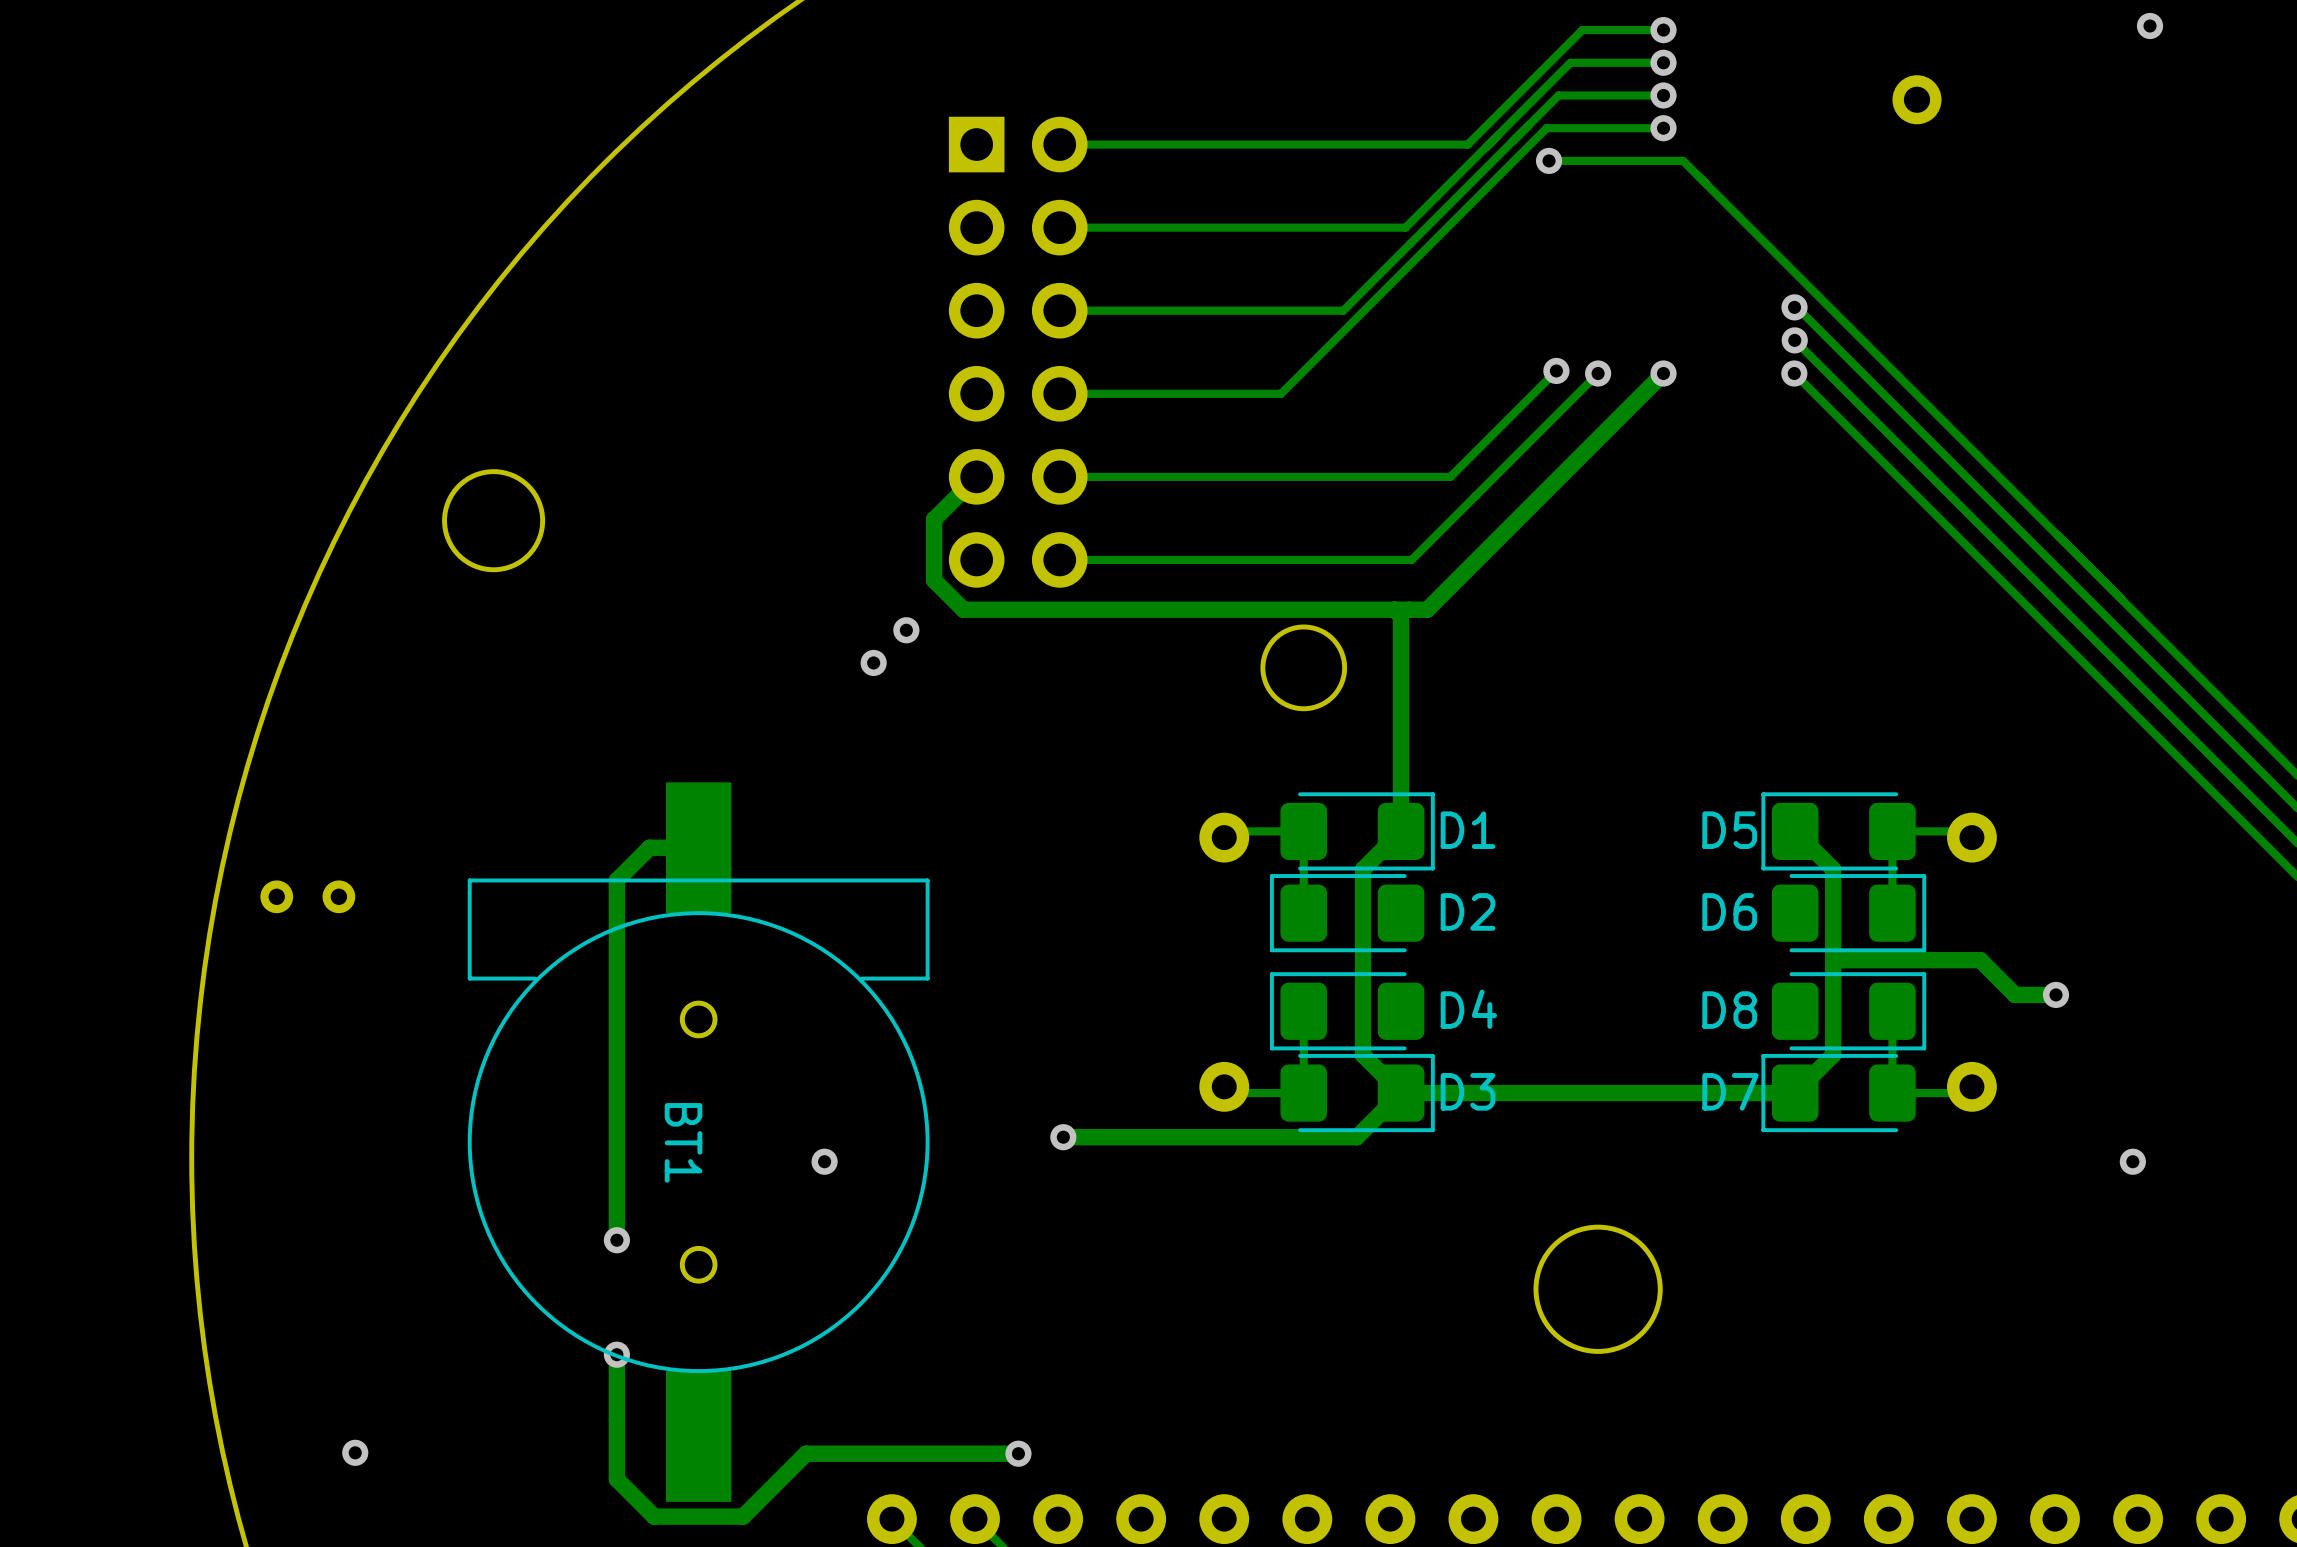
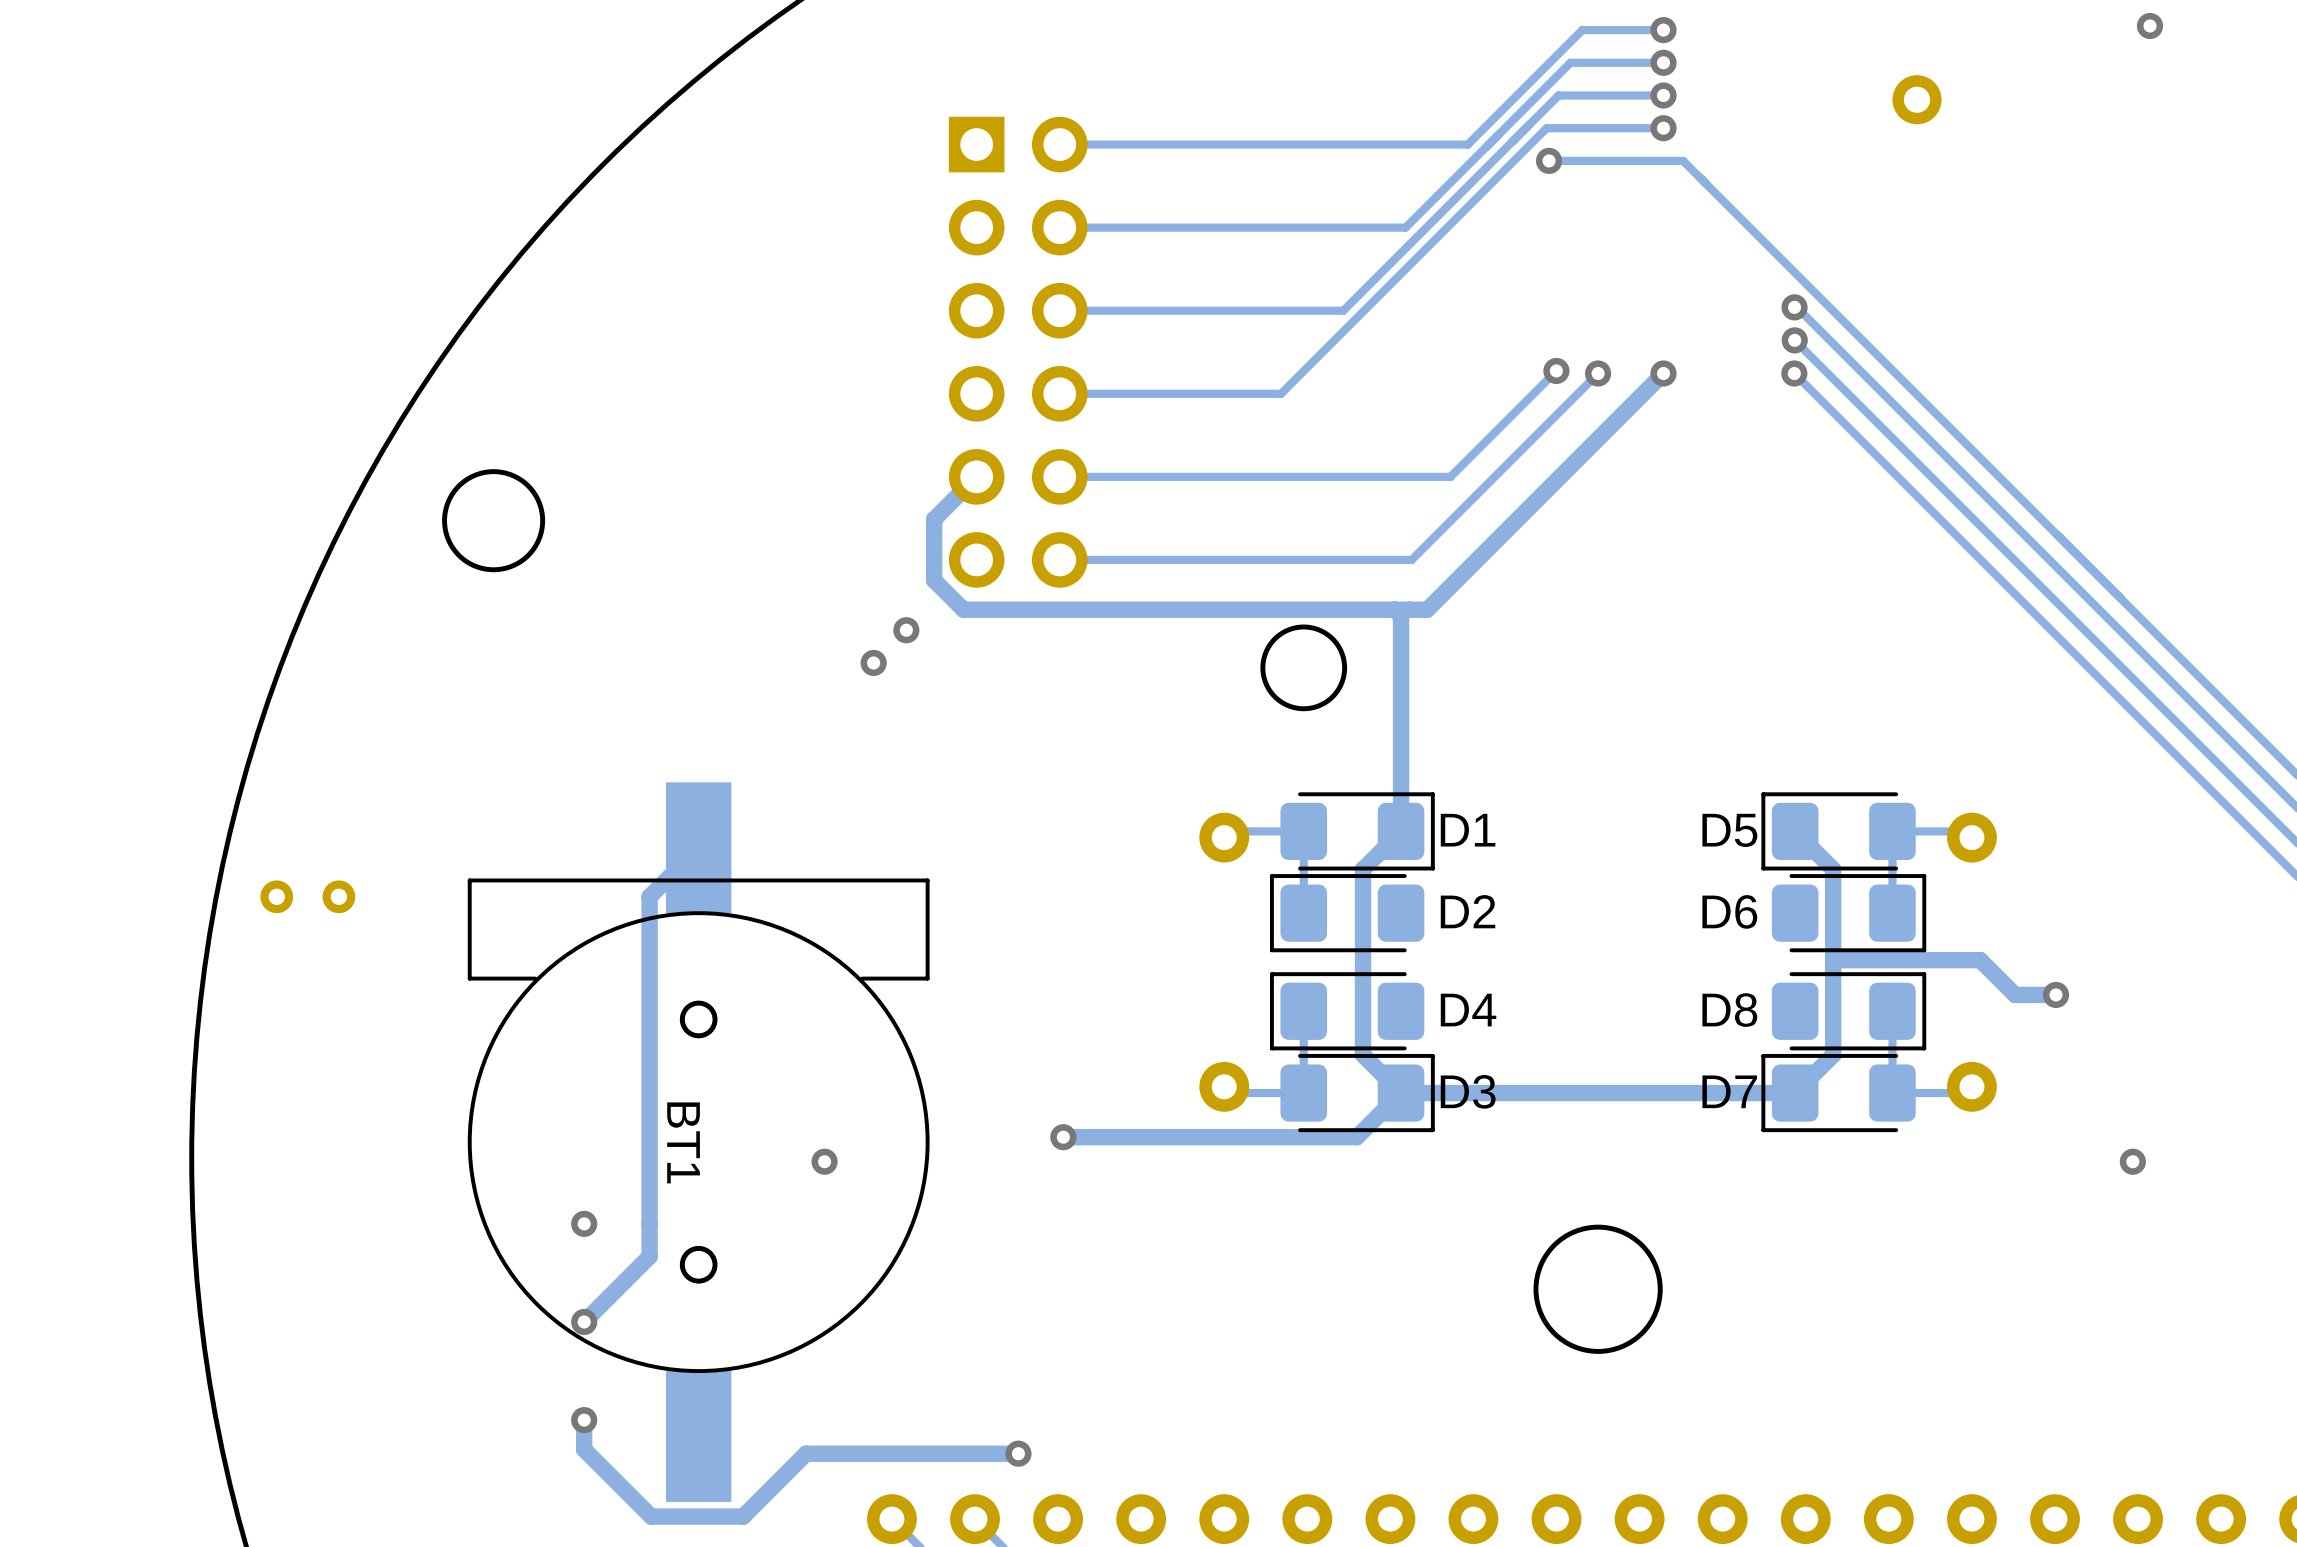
track: (698, 847) (649, 847) (616, 880) (616, 1240) -> (698, 847) (649, 896) (649, 1256) (584, 1321)
via position: (616, 1240) -> (584, 1223)
via: none -> (584, 1321)
track: (616, 1354) (616, 1479) (654, 1516) -> (584, 1420) (584, 1449) (651, 1516) (654, 1516)
via: (616, 1354) -> none
via: none -> (584, 1420)
via: (355, 1452) -> none

